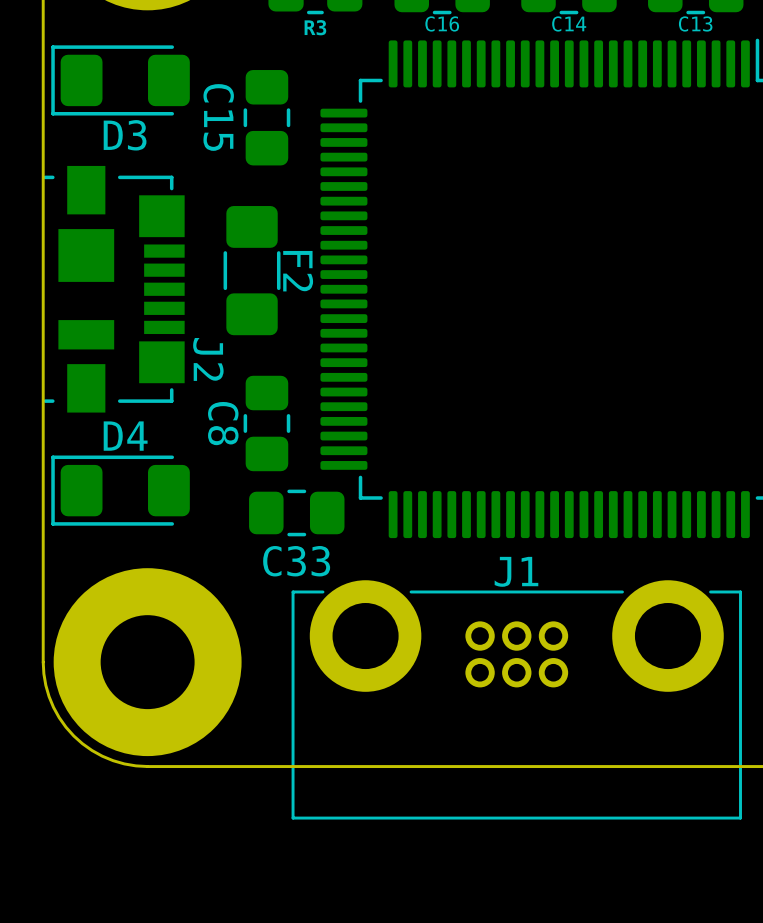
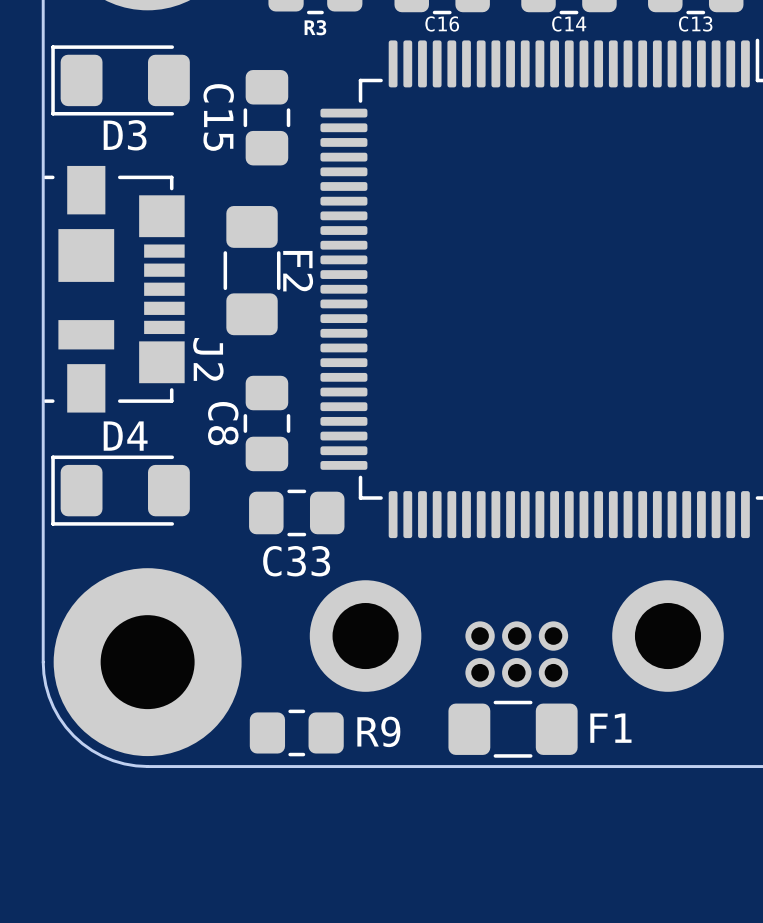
J1 side: bottom (516, 699) -> top (516, 636)
F1: none -> (513, 729)
R9: none -> (296, 732)

